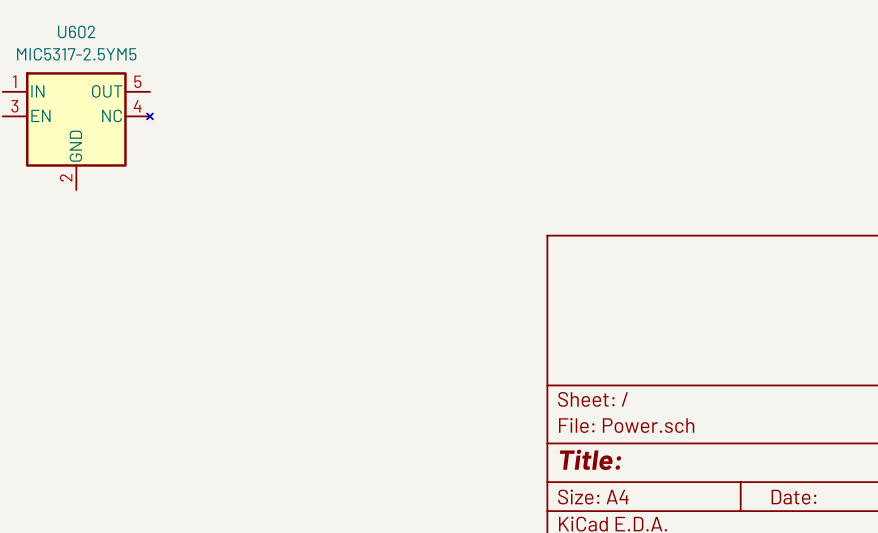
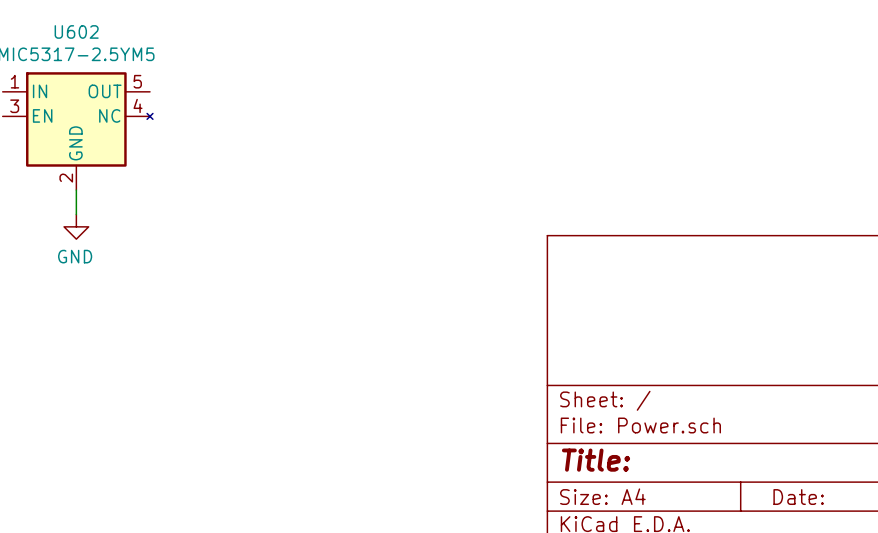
wire: none -> (76, 190) (76, 214)
power symbol: none -> GND (76, 226)

